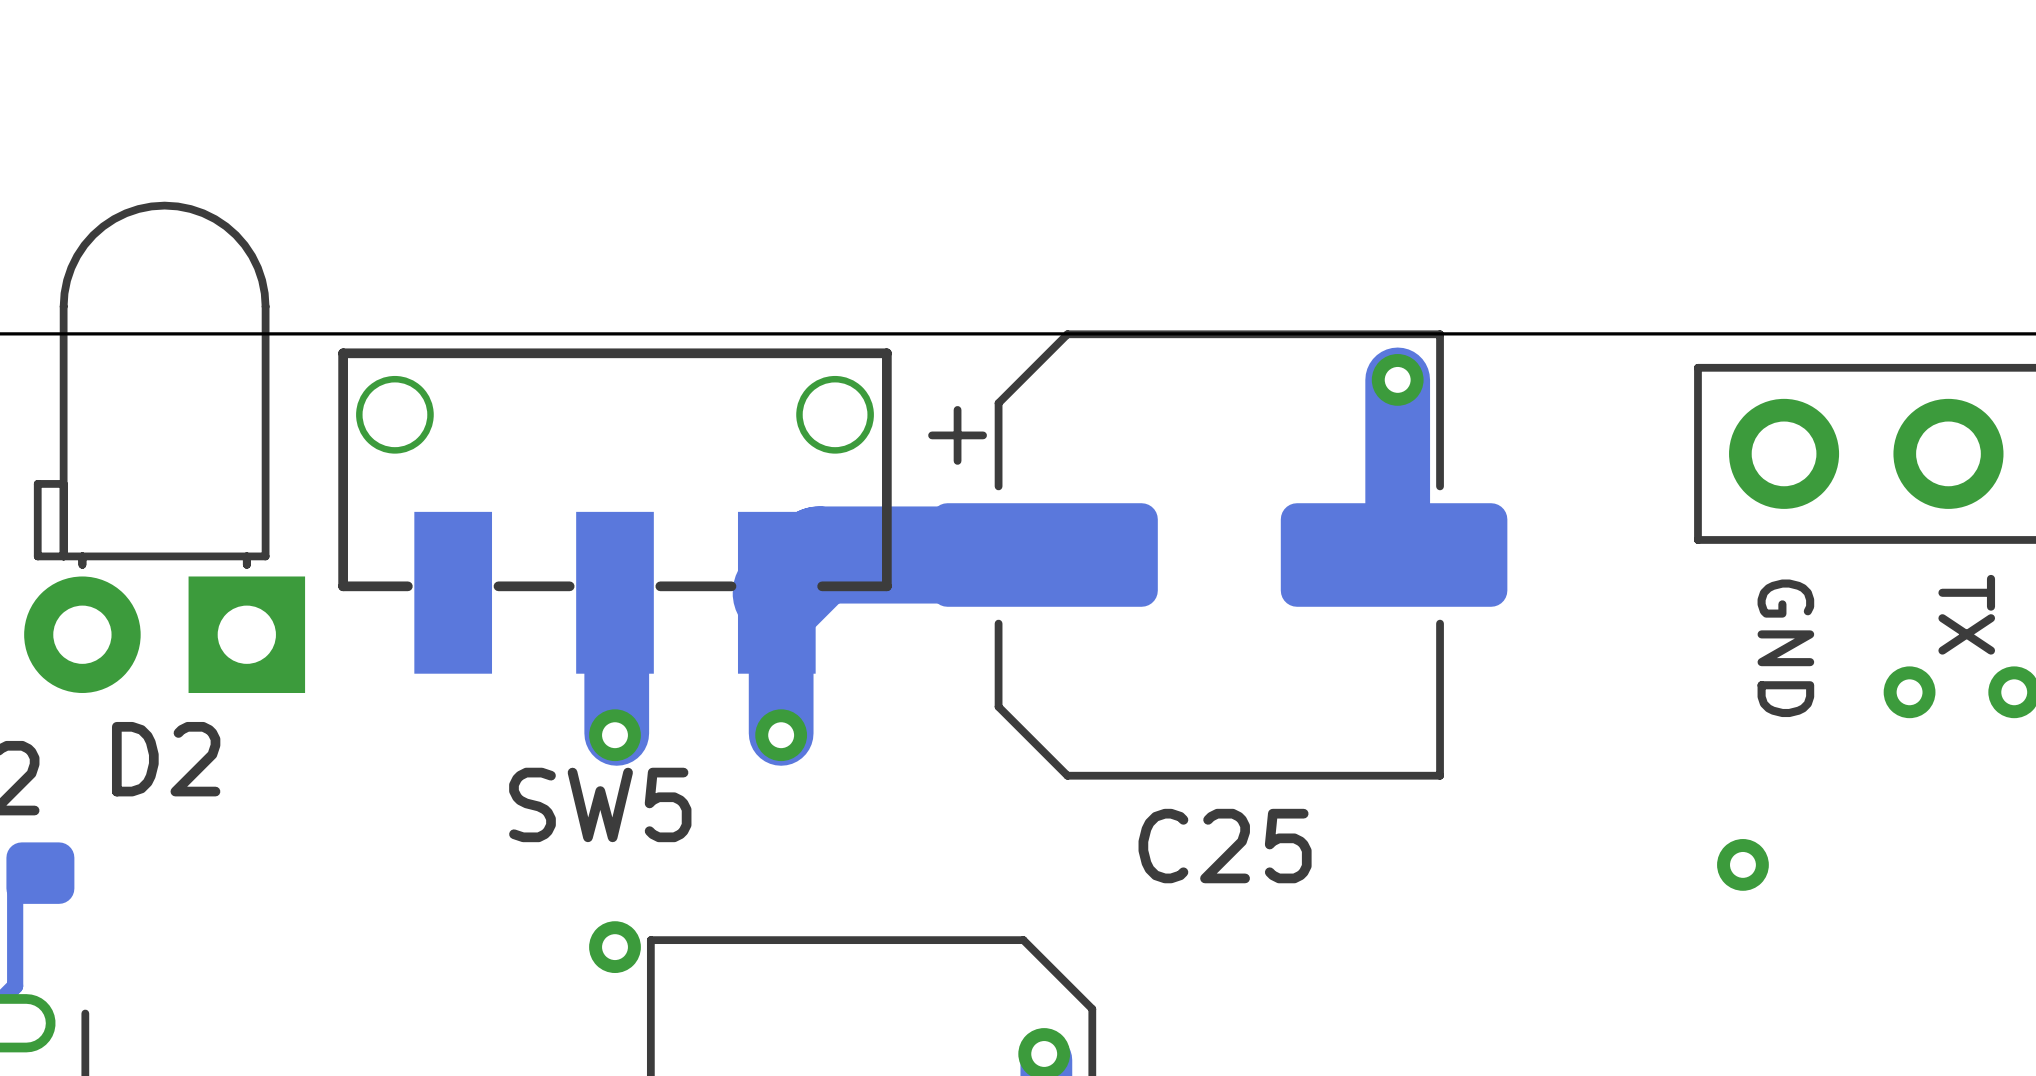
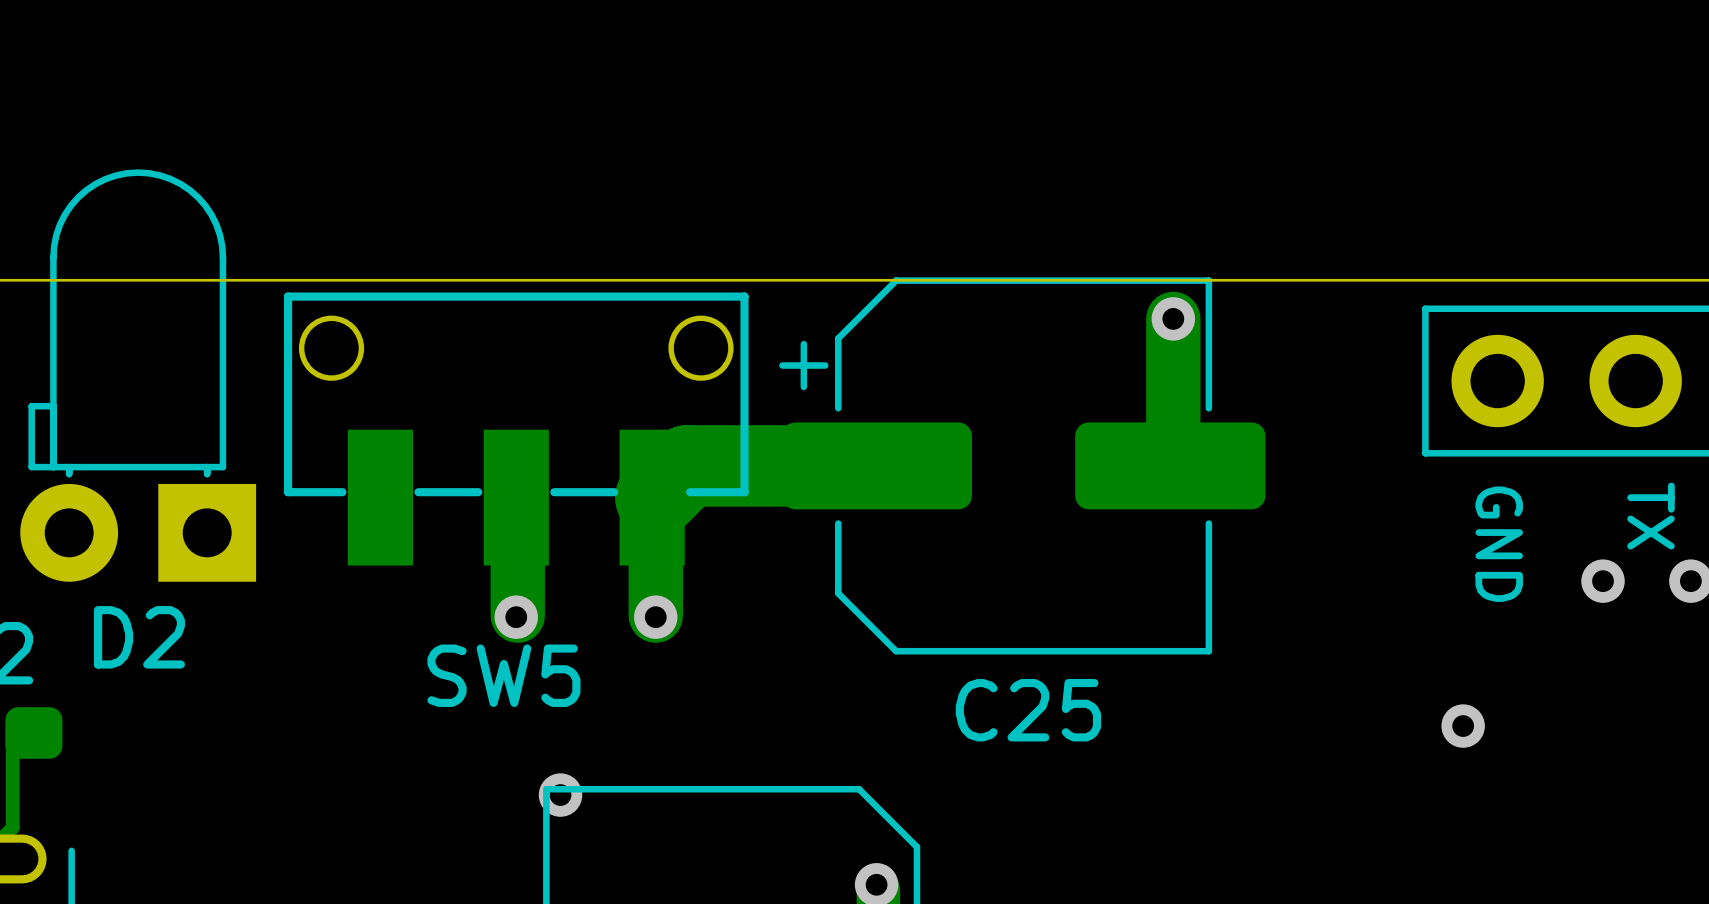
via position: (614, 947) -> (560, 795)

